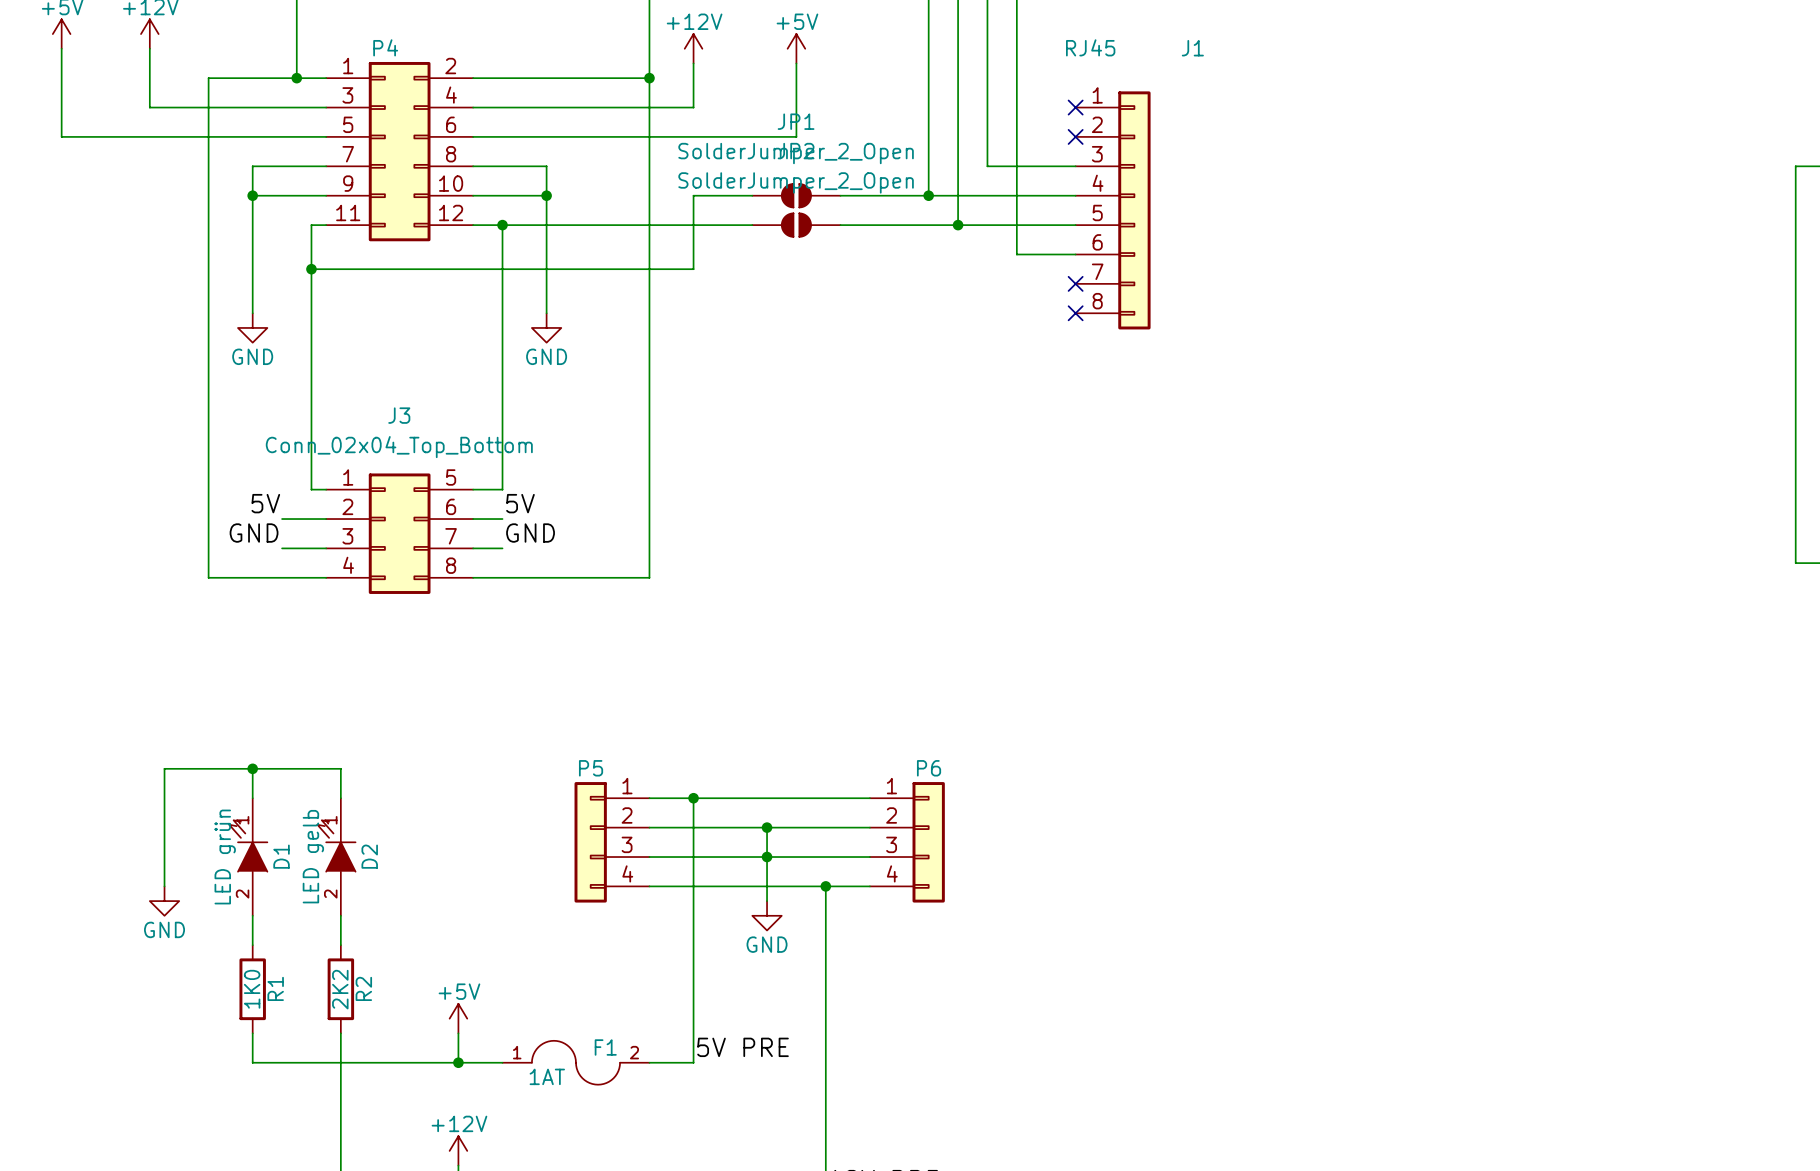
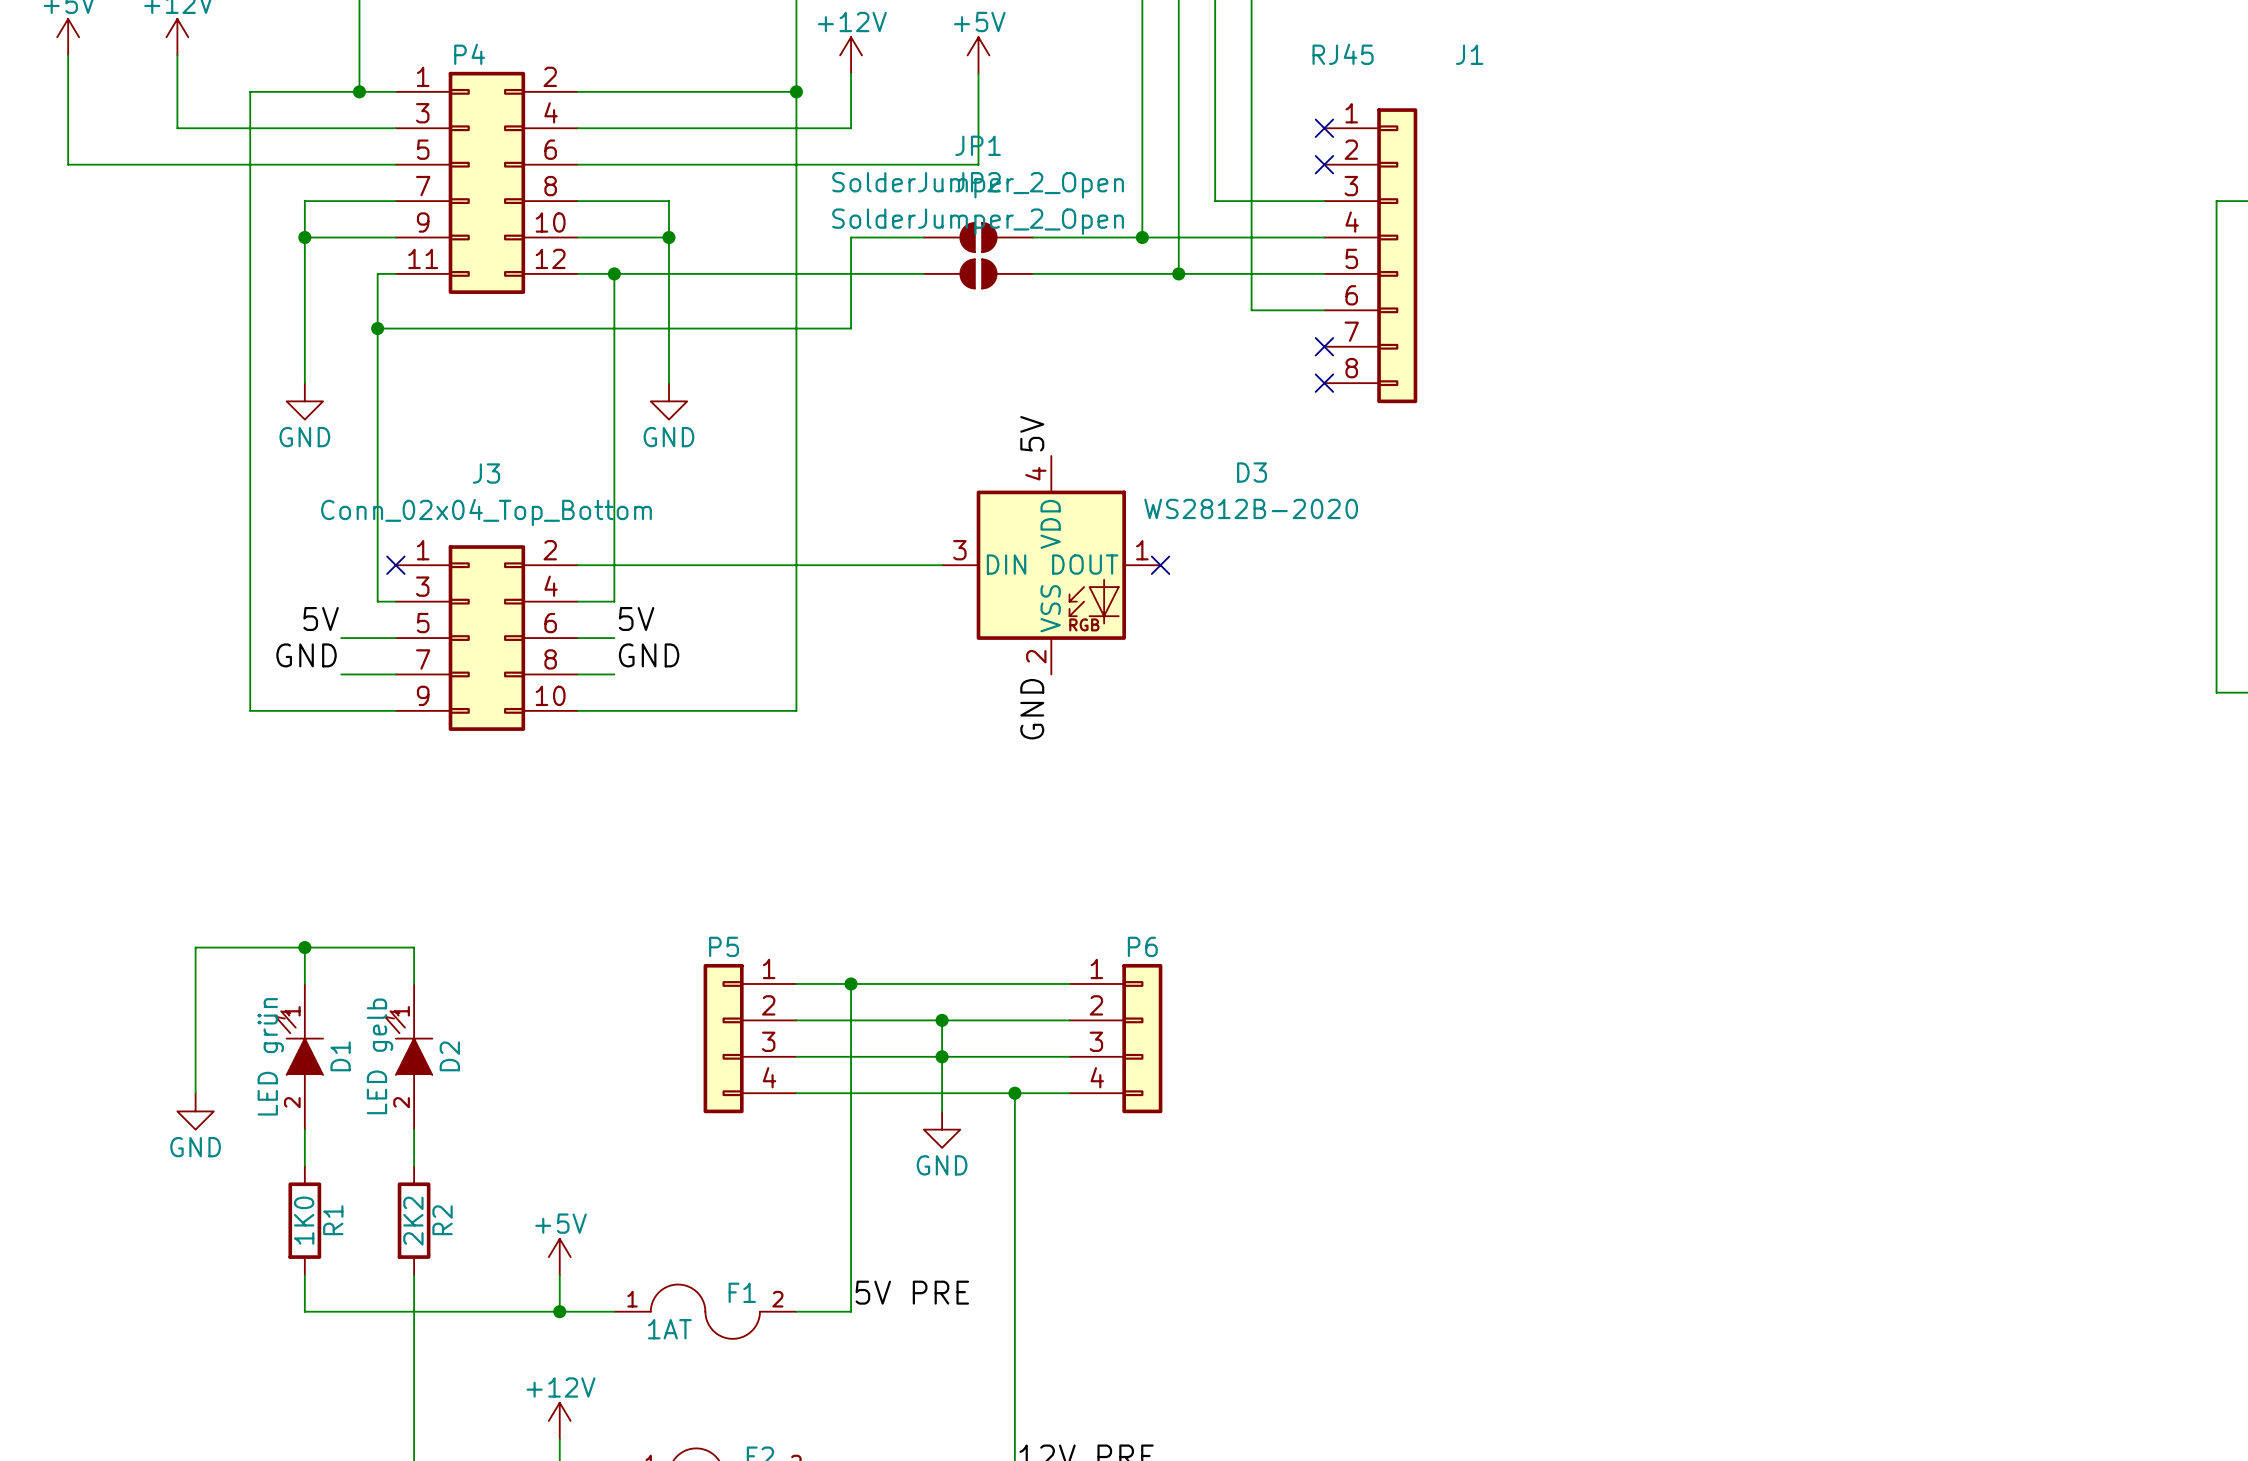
label: none -> 5V (1032, 433)
no-connect mark: none -> (395, 565)
wire: none -> (577, 565) (942, 565)
D3: none -> WS2812B-2020 (1051, 565)
no-connect mark: none -> (1160, 565)
J3 symbol: [326, 473, 474, 594] -> [395, 545, 578, 731]
label: none -> GND (1032, 709)

